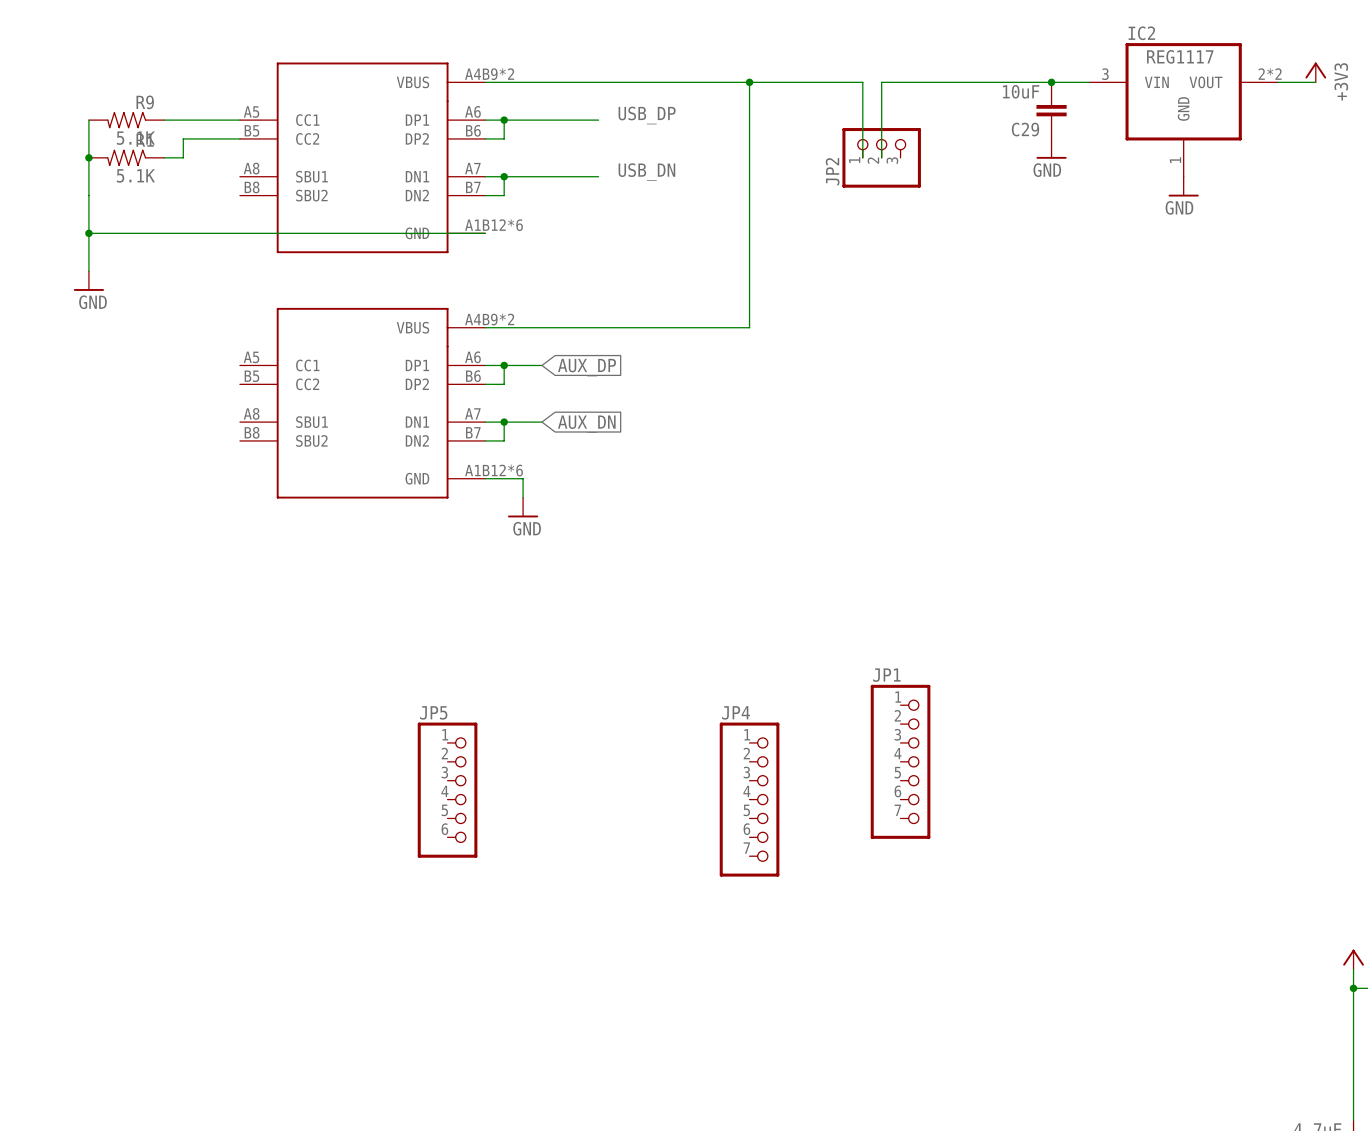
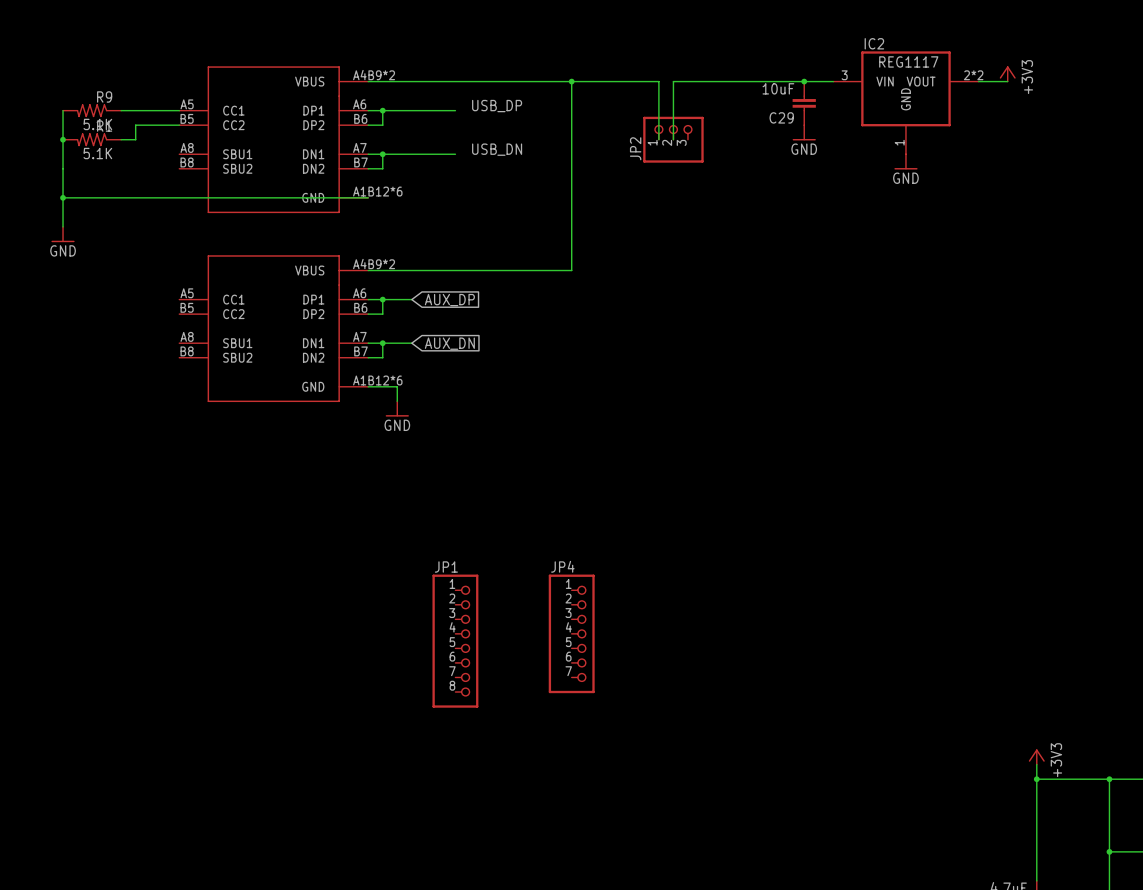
JP1 symbol: [870, 684, 931, 839] -> [432, 574, 479, 708]
JP5: (447, 790) -> none

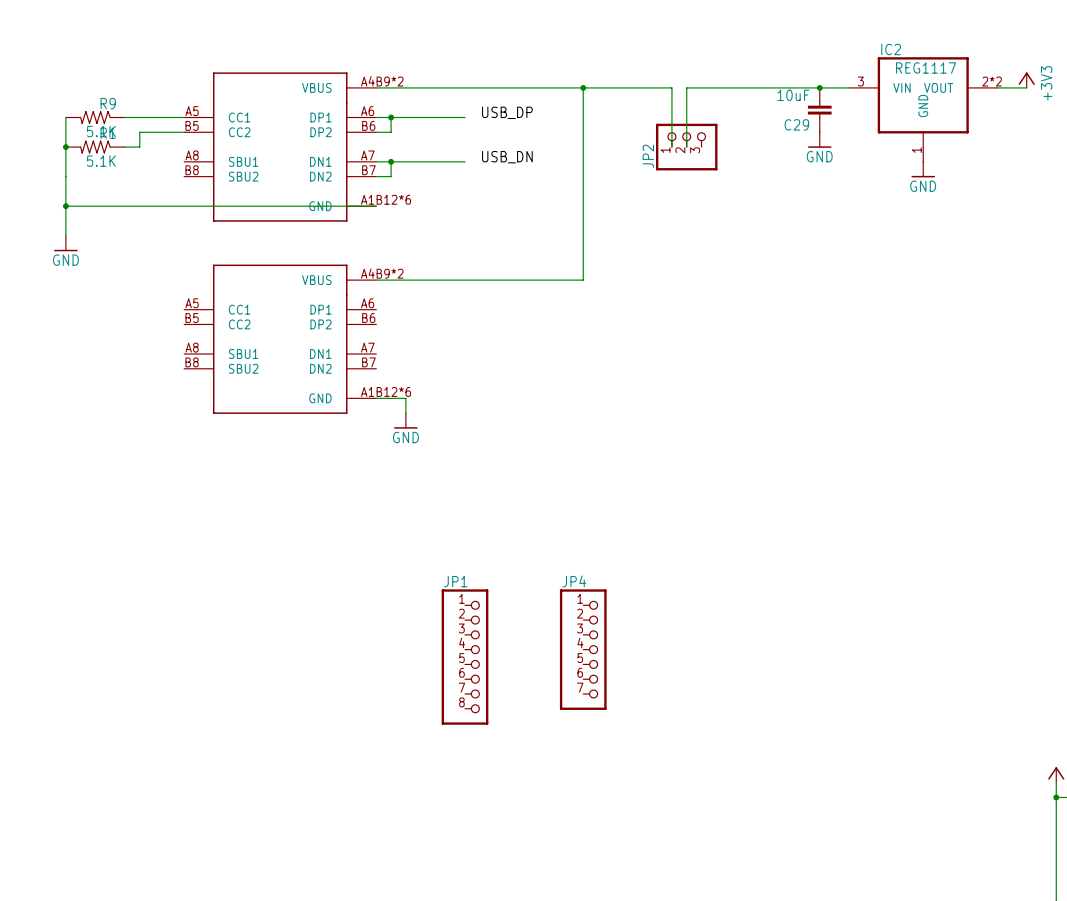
wire: (368, 299) (411, 299) -> none
wire: (382, 299) (382, 314) (368, 314) -> none
junction: (382, 299) -> none
global label: AUX_DP (449, 300) -> none
wire: (368, 343) (411, 343) -> none
wire: (382, 343) (382, 357) (368, 357) -> none
junction: (382, 343) -> none
global label: AUX_DN (449, 343) -> none

